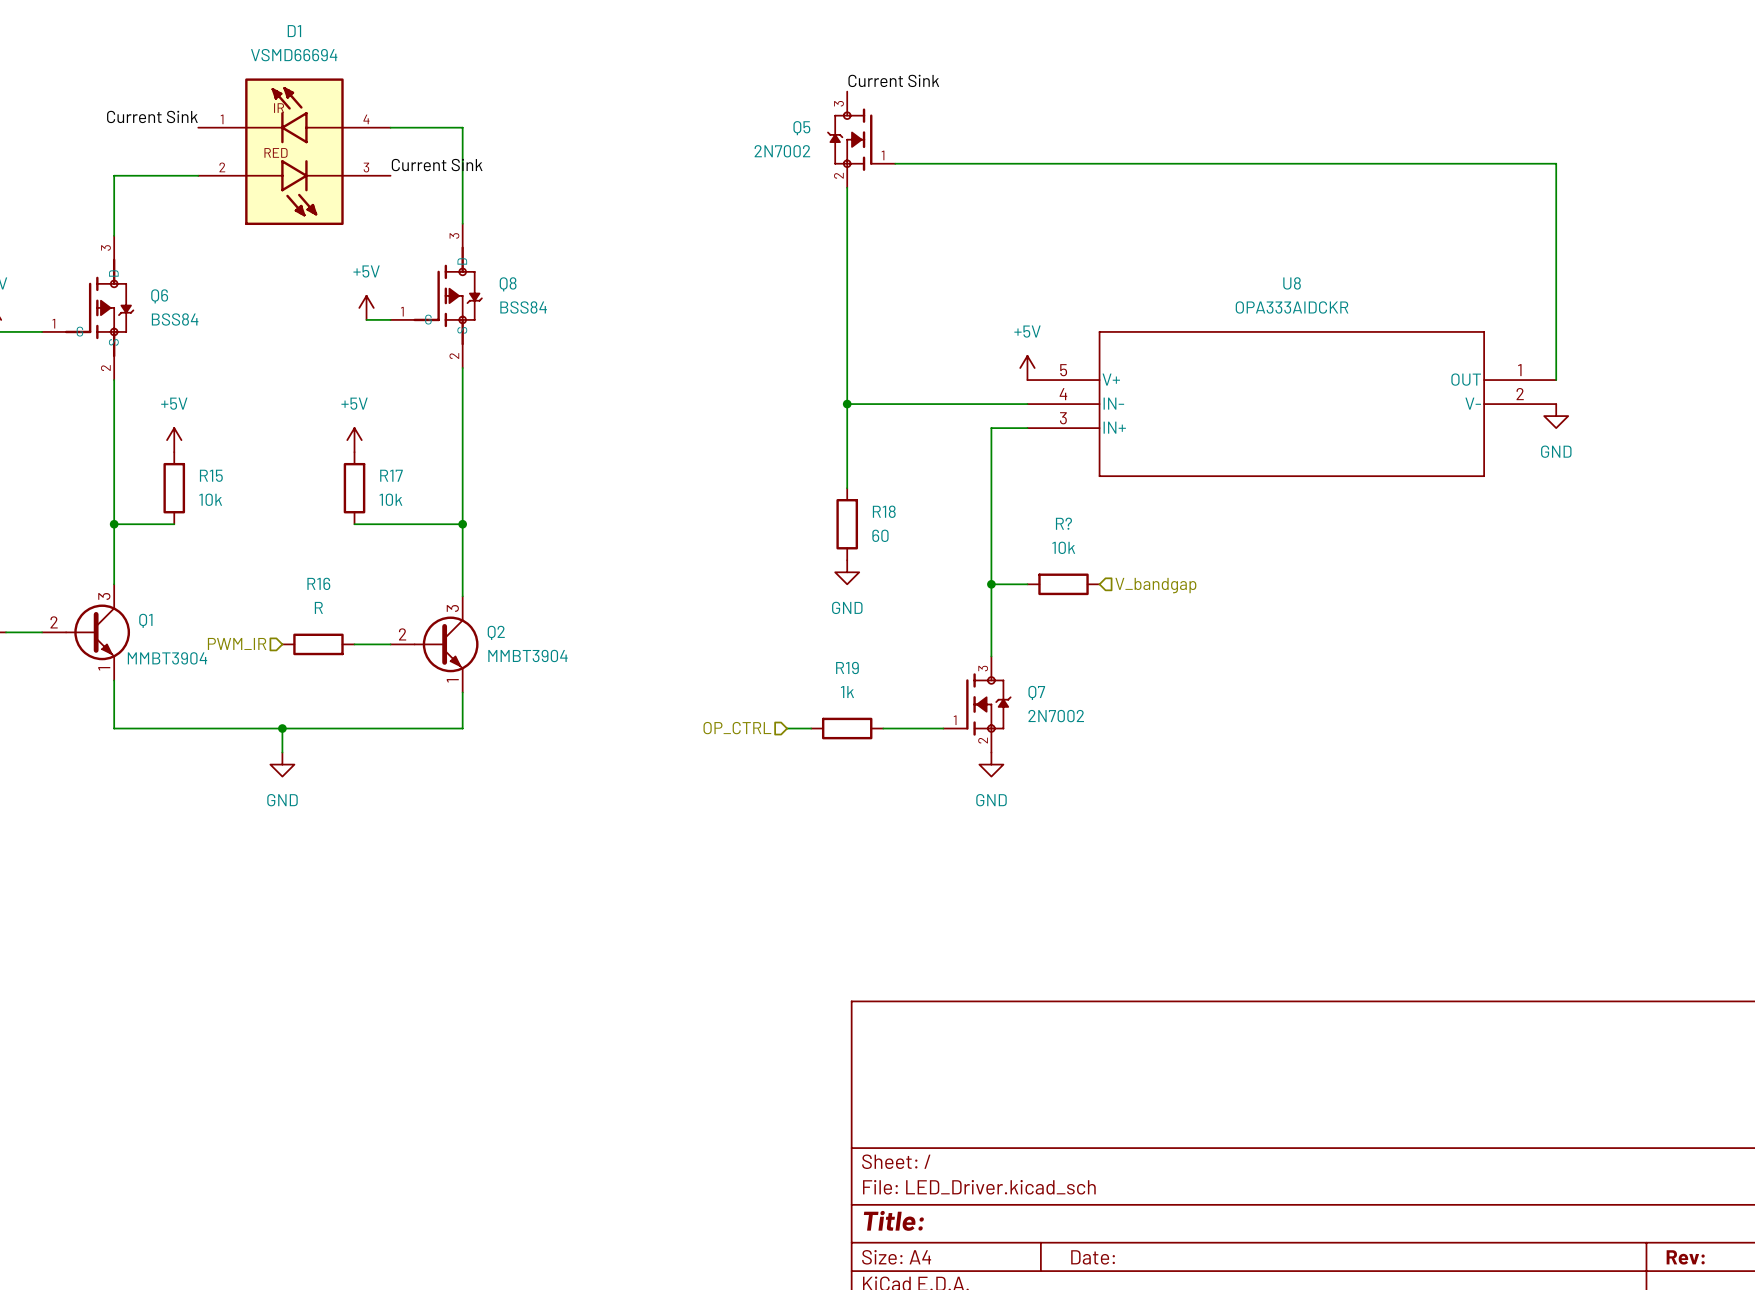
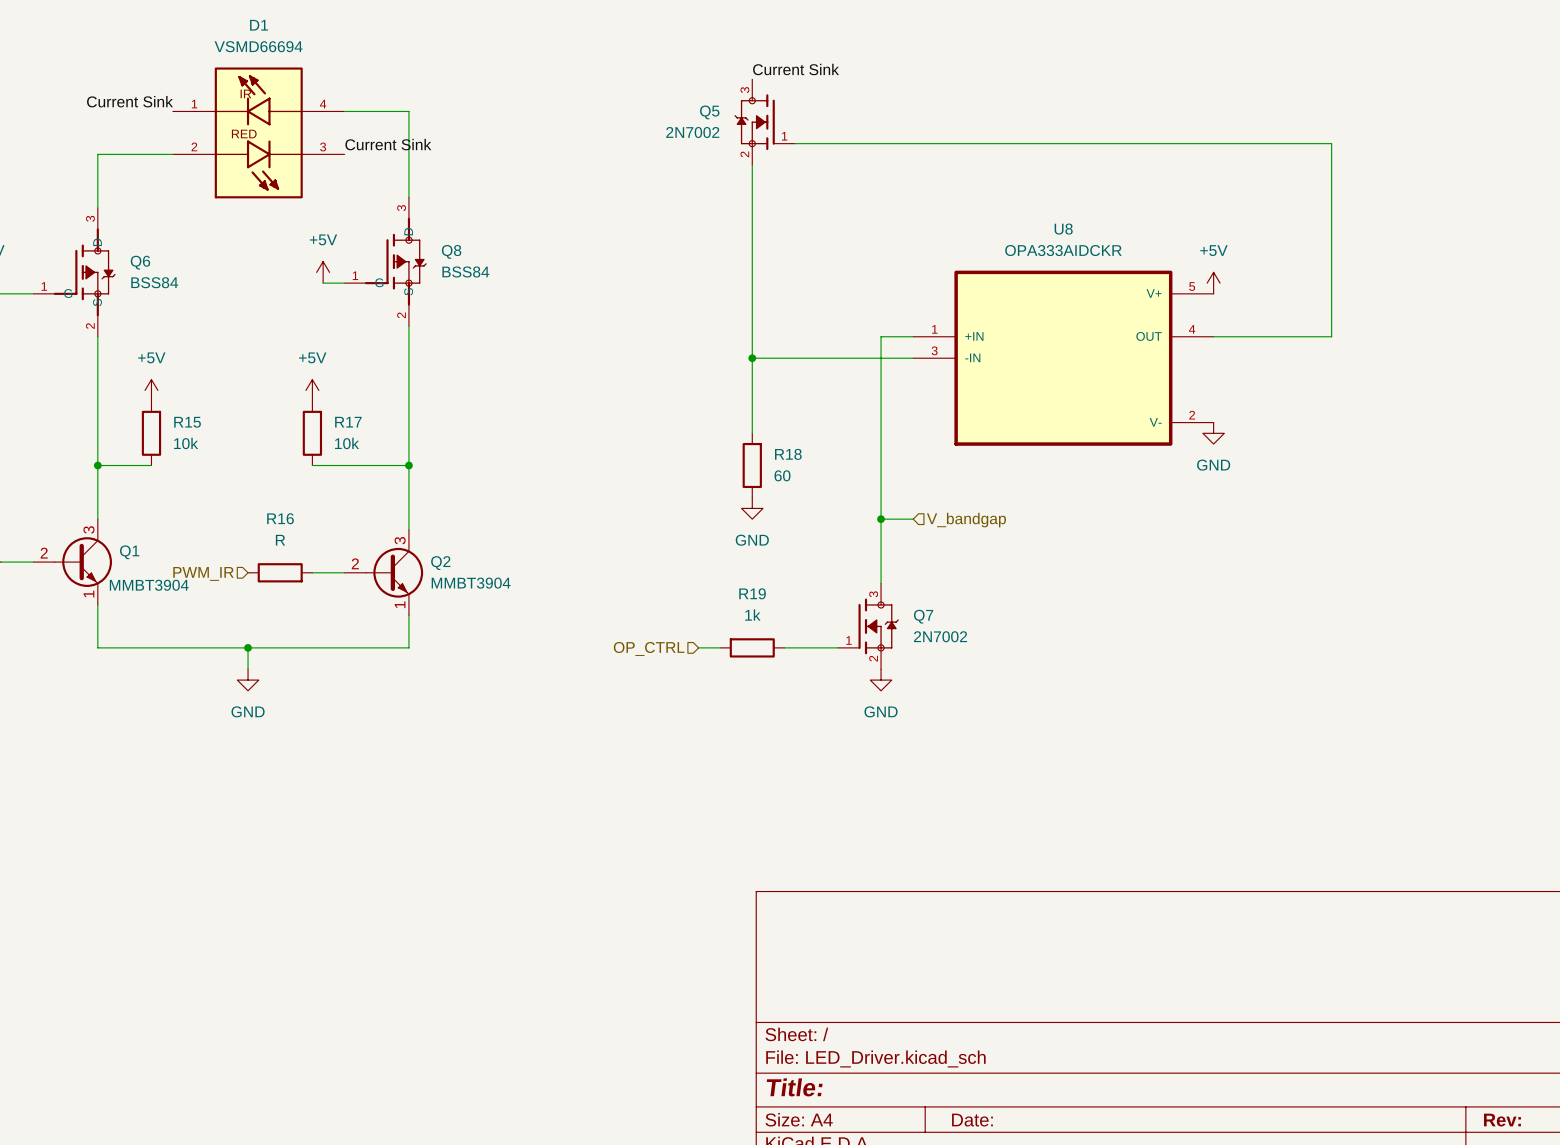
wire: (1496, 163) (1556, 163) (1556, 380) -> (1331, 143) (1331, 336) (1213, 336)
U8 name position: U8 (1292, 283) -> U8 (1063, 229)
U8 value position: OPA333AIDCKR (1292, 307) -> OPA333AIDCKR (1063, 250)
power symbol: none -> +5V (1213, 283)
U8 symbol: [1027, 331, 1557, 477] -> [913, 270, 1214, 446]
power symbol: +5V (1027, 368) -> none
power symbol position: GND (1556, 416) -> GND (1213, 433)
wire: (991, 428) (1027, 428) -> (881, 379) (881, 336) (913, 336)
R?: 10k (1063, 584) -> none
hierarchical label position: V_bandgap (1155, 585) -> V_bandgap (966, 520)

